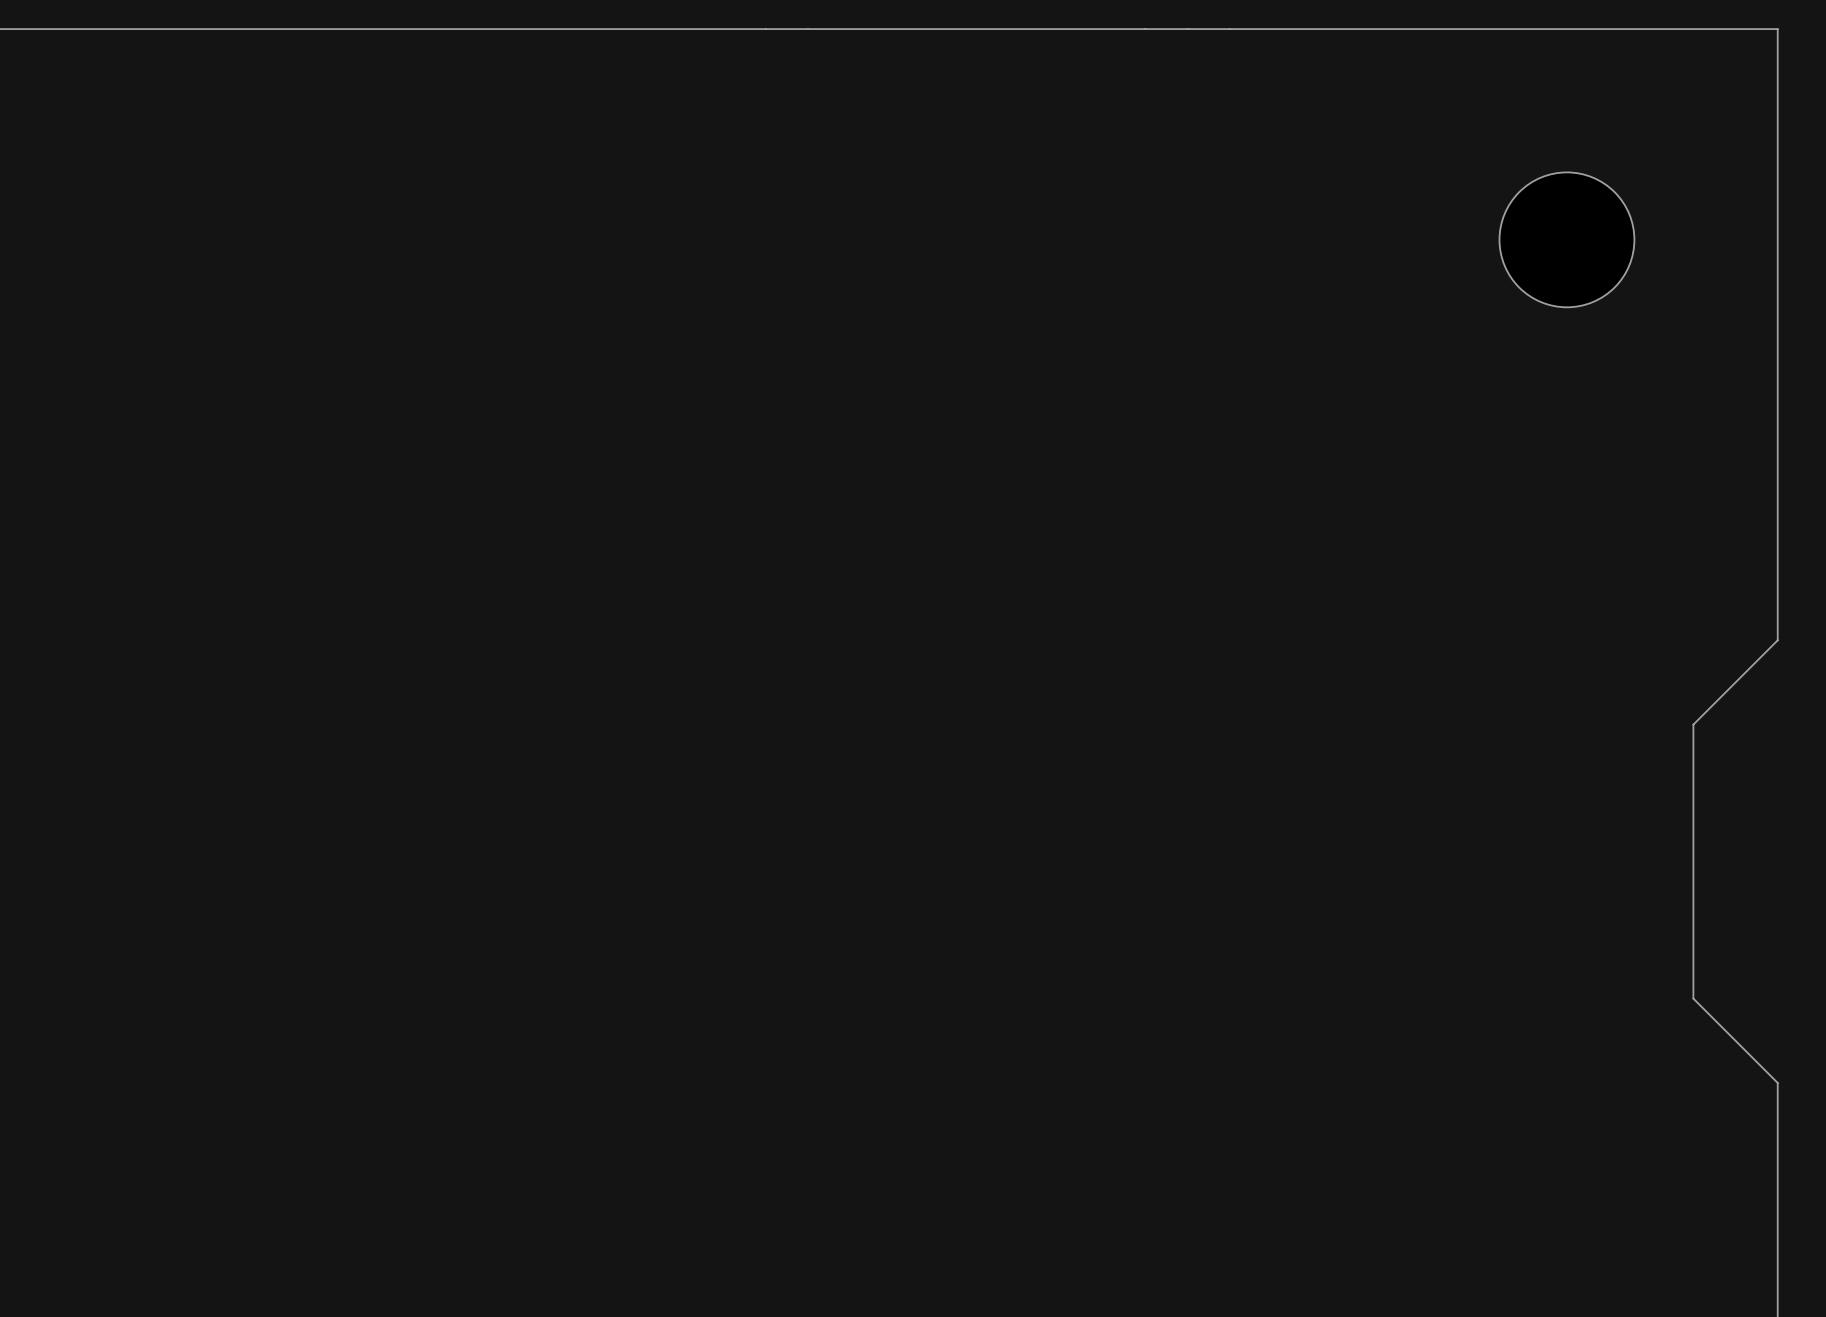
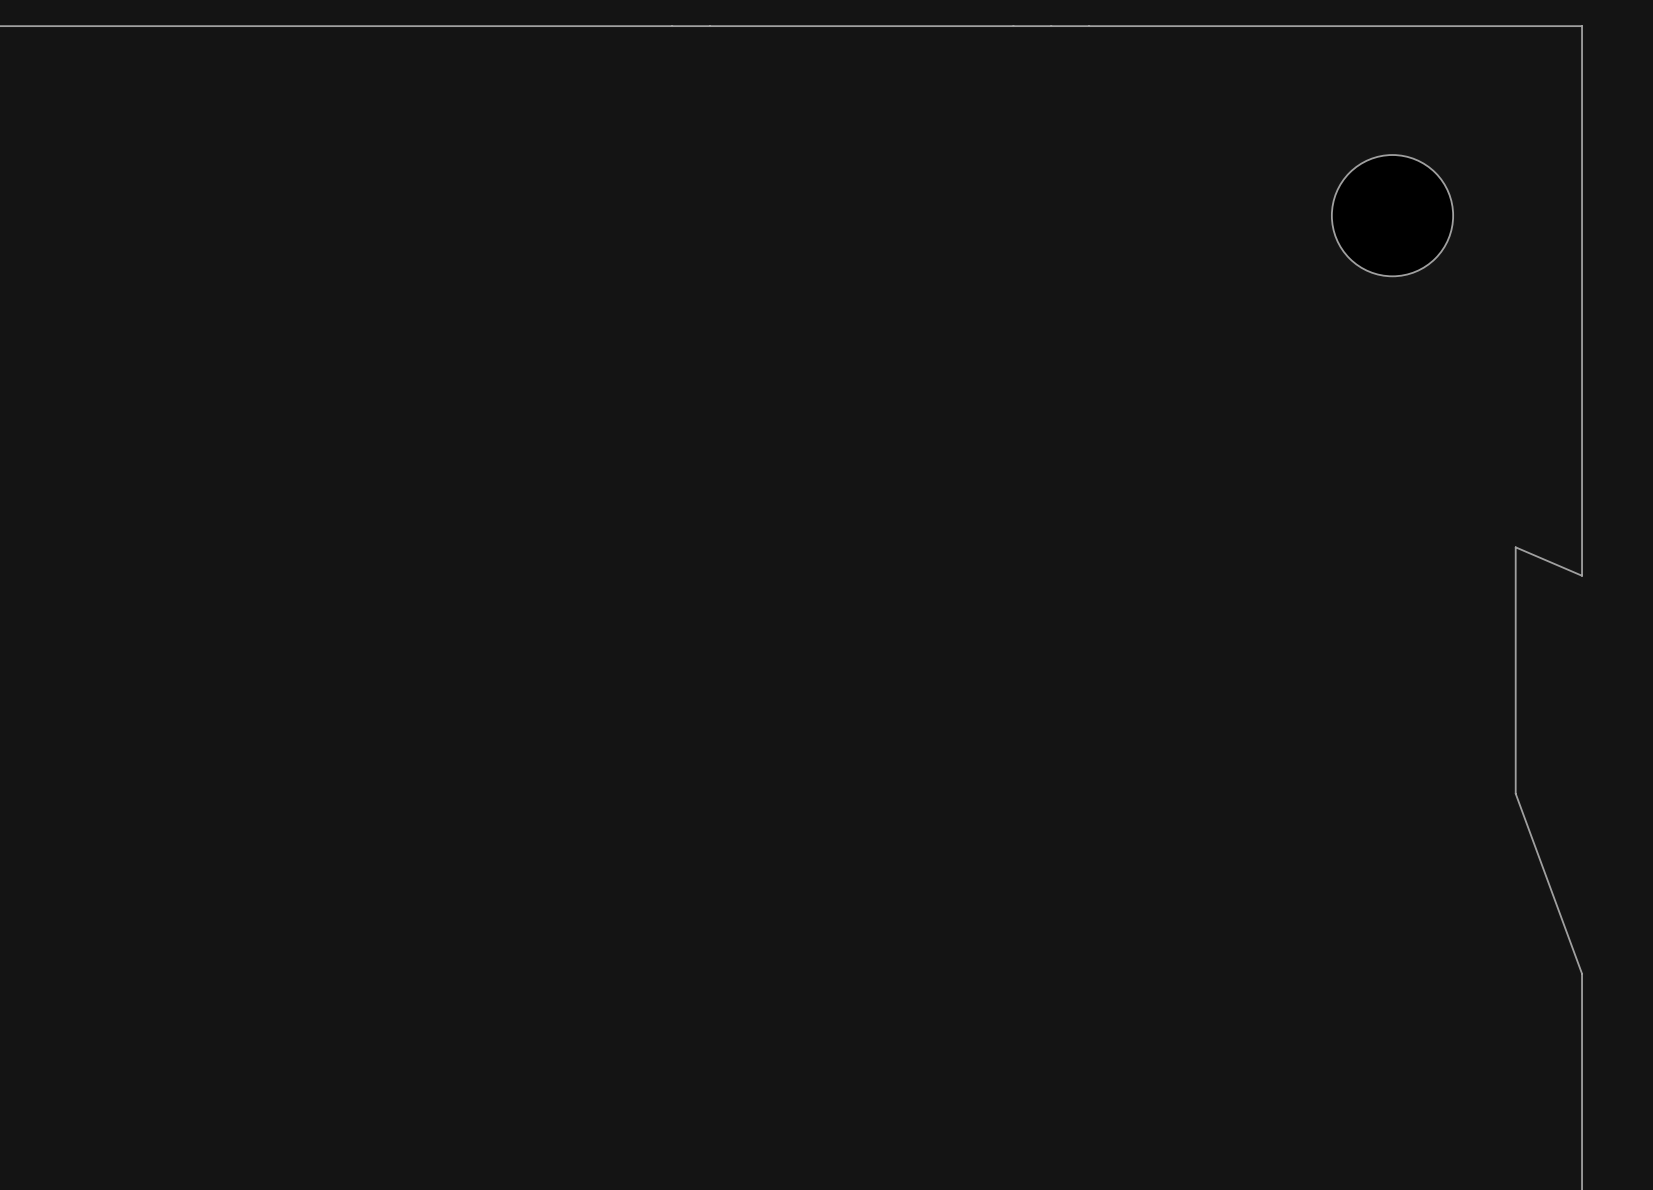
board edge: (1777, 640) (1693, 724) (1693, 998) (1777, 1082) -> (1582, 575) (1515, 547) (1515, 793) (1582, 973)

